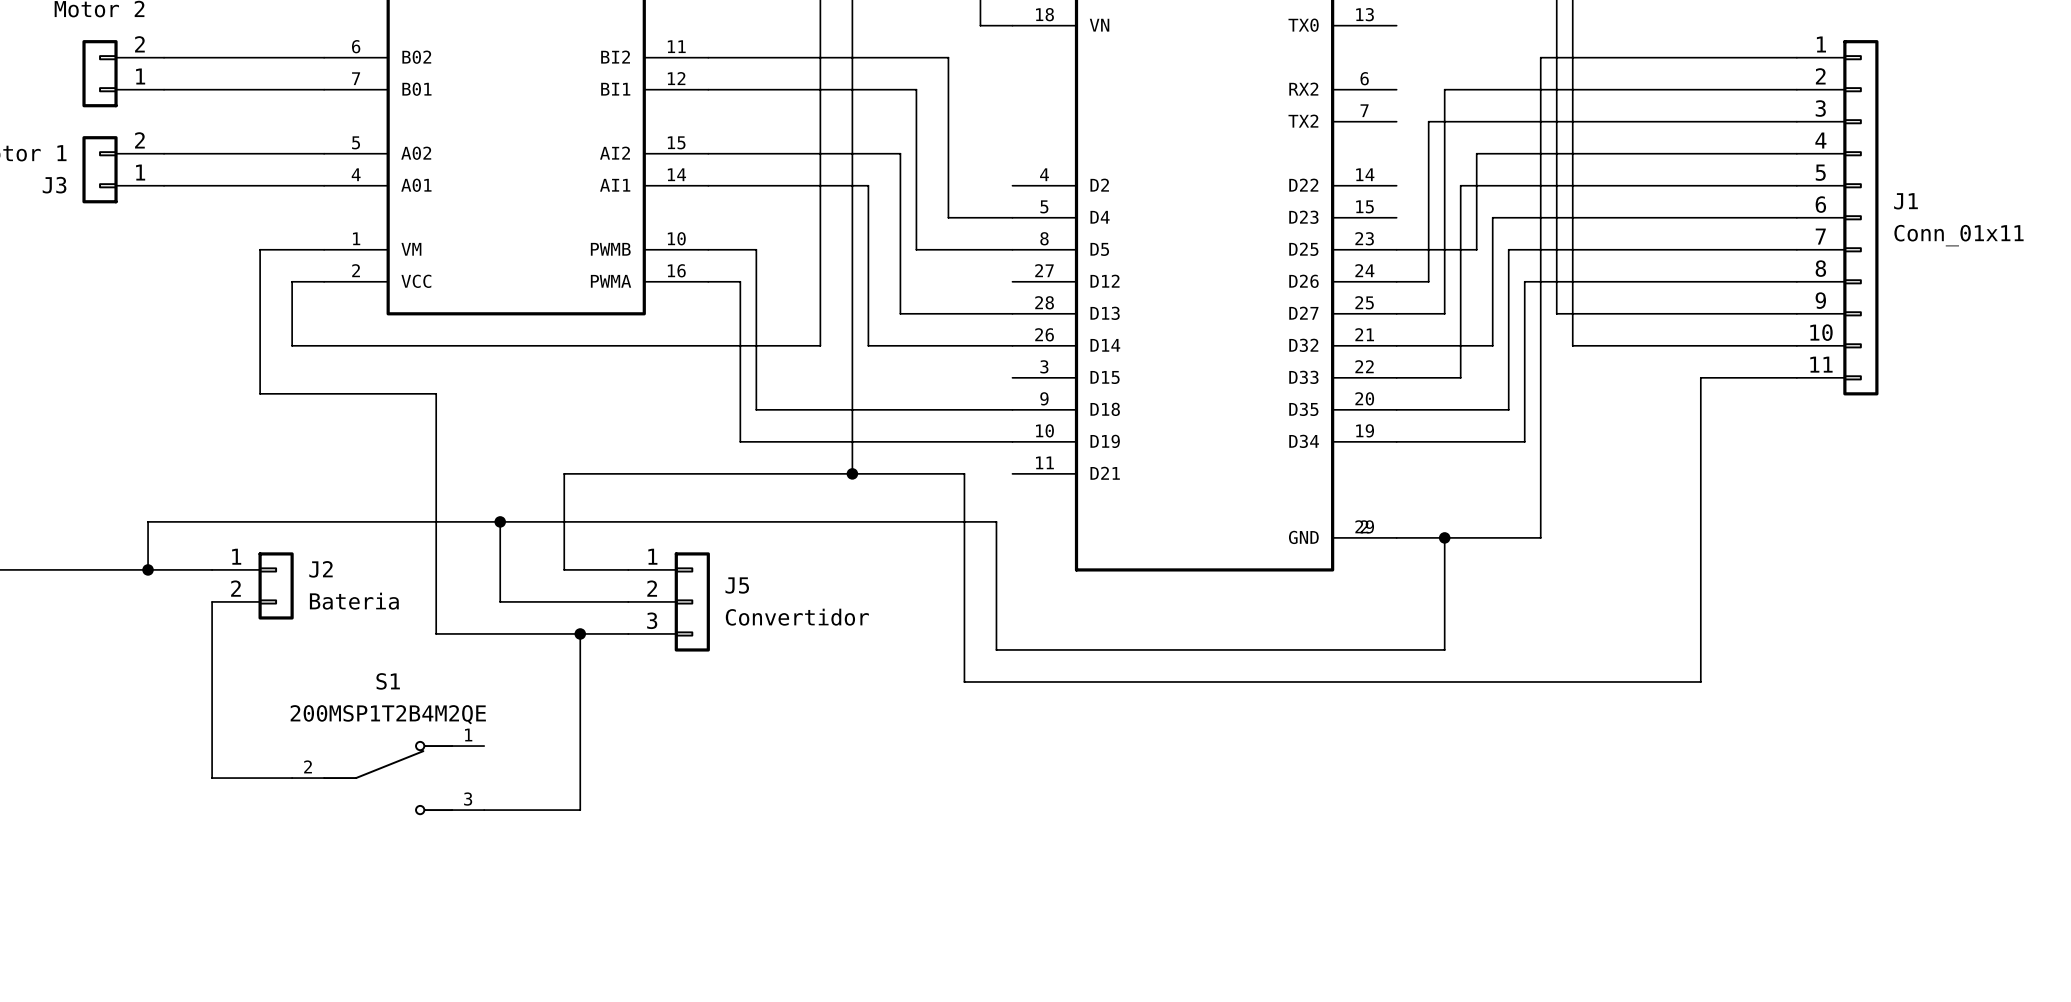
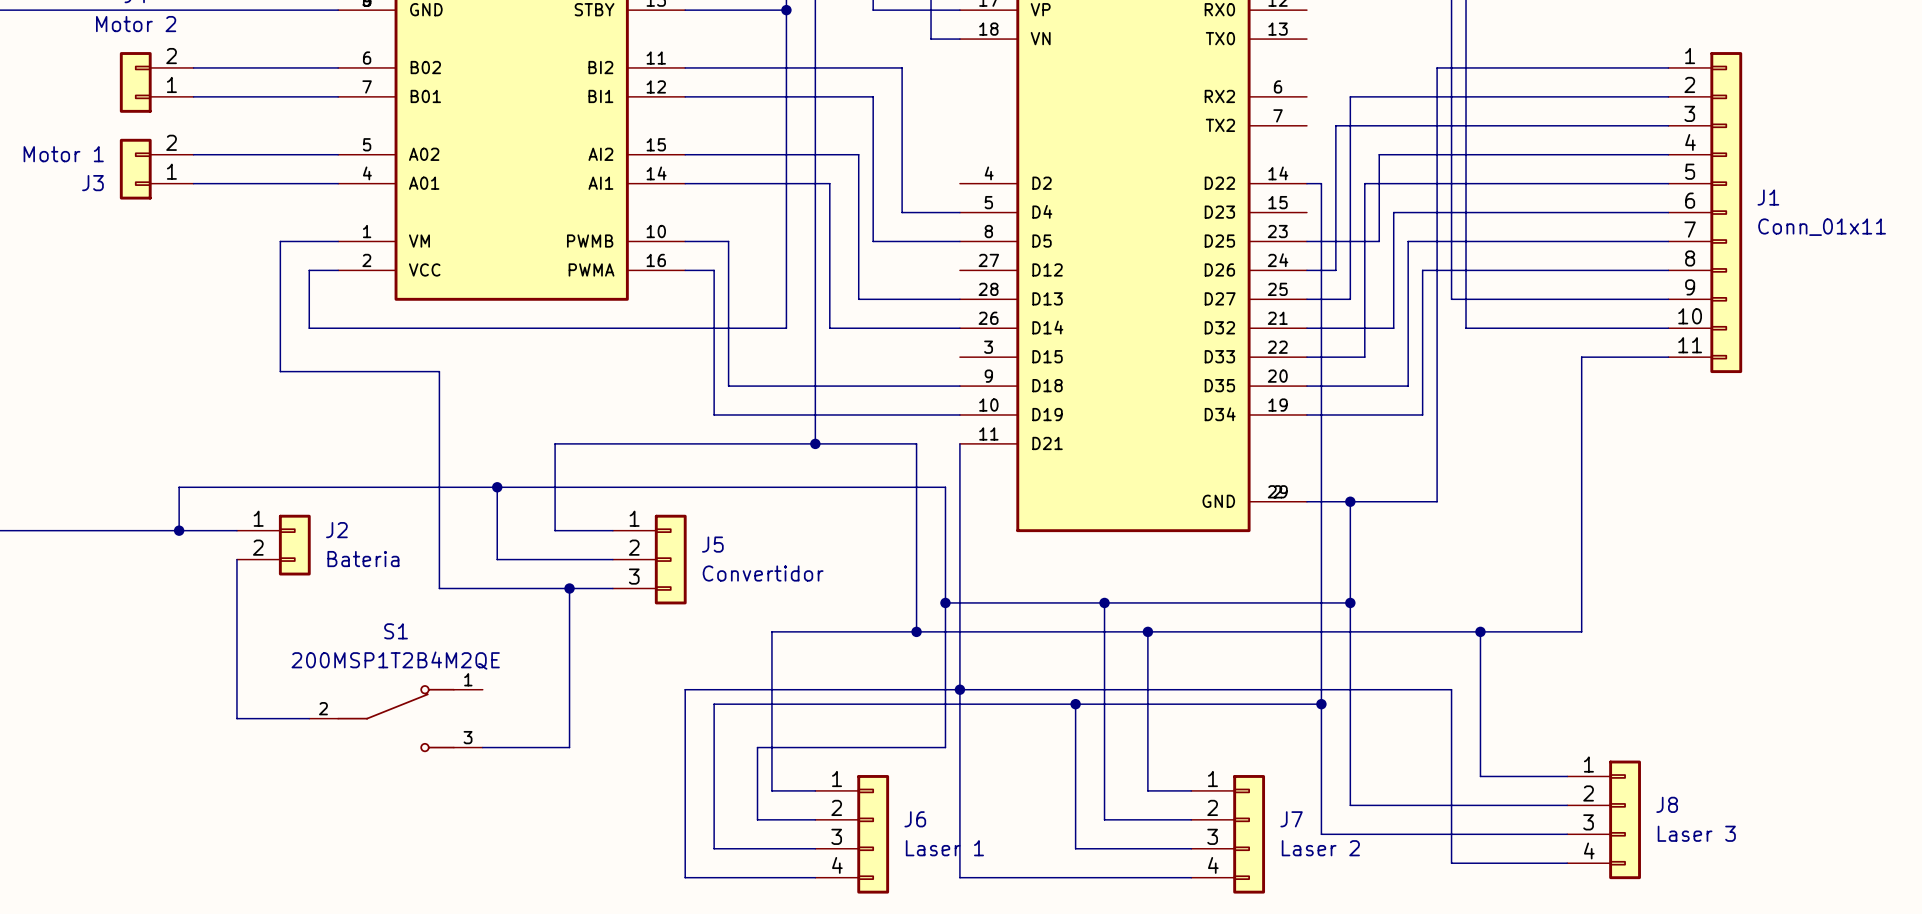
wire: none -> (1306, 183) (1321, 183) (1321, 834) (1567, 834)
wire: none -> (959, 443) (959, 877) (1191, 877)
wire: none -> (945, 602) (945, 747) (757, 747) (757, 819) (815, 819)
junction: none -> (945, 602)
wire: none -> (1104, 602) (1104, 819) (1191, 819)
junction: none -> (1104, 602)
wire: none -> (1350, 602) (1350, 805) (1567, 805)
junction: none -> (1350, 602)
wire: none -> (916, 631) (771, 631) (771, 790) (815, 790)
junction: none -> (916, 631)
wire: none -> (1147, 631) (1147, 790) (1191, 790)
junction: none -> (1147, 631)
wire: none -> (1480, 631) (1480, 776) (1567, 776)
junction: none -> (1480, 631)
junction: none -> (959, 689)
wire: none -> (1075, 704) (1075, 848) (1191, 848)
junction: none -> (1075, 704)
wire: none -> (1321, 704) (714, 704) (714, 848) (815, 848)
junction: none -> (1321, 704)
J8: none -> Laser 3 (1604, 819)
J6: none -> Laser 1 (852, 834)
J7: none -> Laser 2 (1228, 834)
wire: none -> (1567, 863) (1451, 863) (1451, 689) (685, 689) (685, 877) (815, 877)

